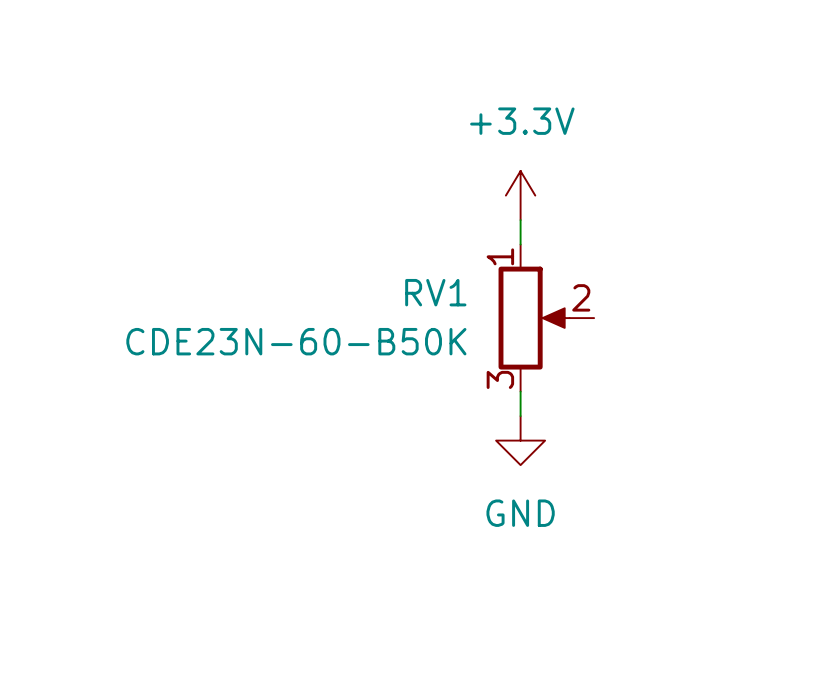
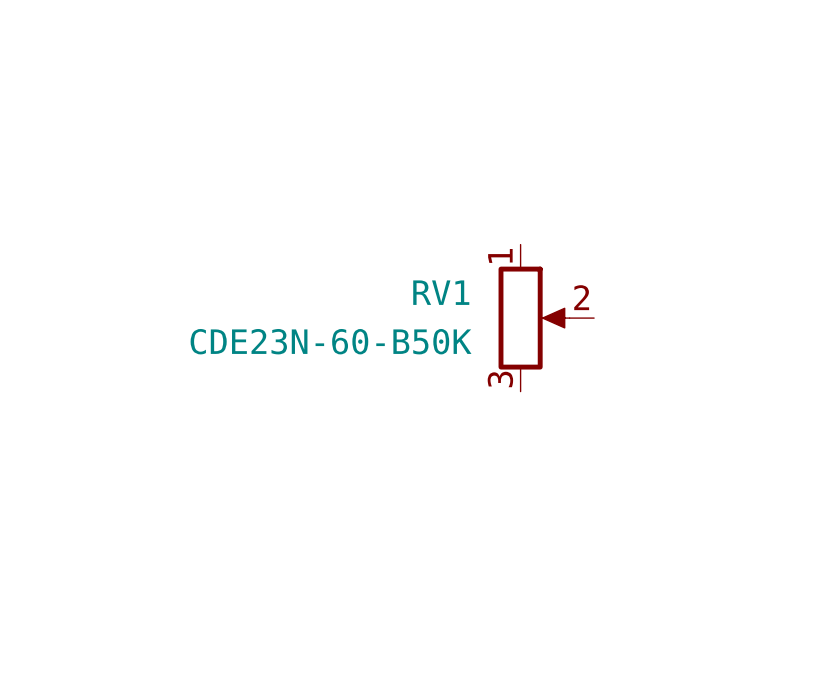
power symbol: +3.3V (520, 195) -> none
wire: (520, 220) (520, 244) -> none
wire: (520, 391) (520, 416) -> none
power symbol: GND (520, 440) -> none

